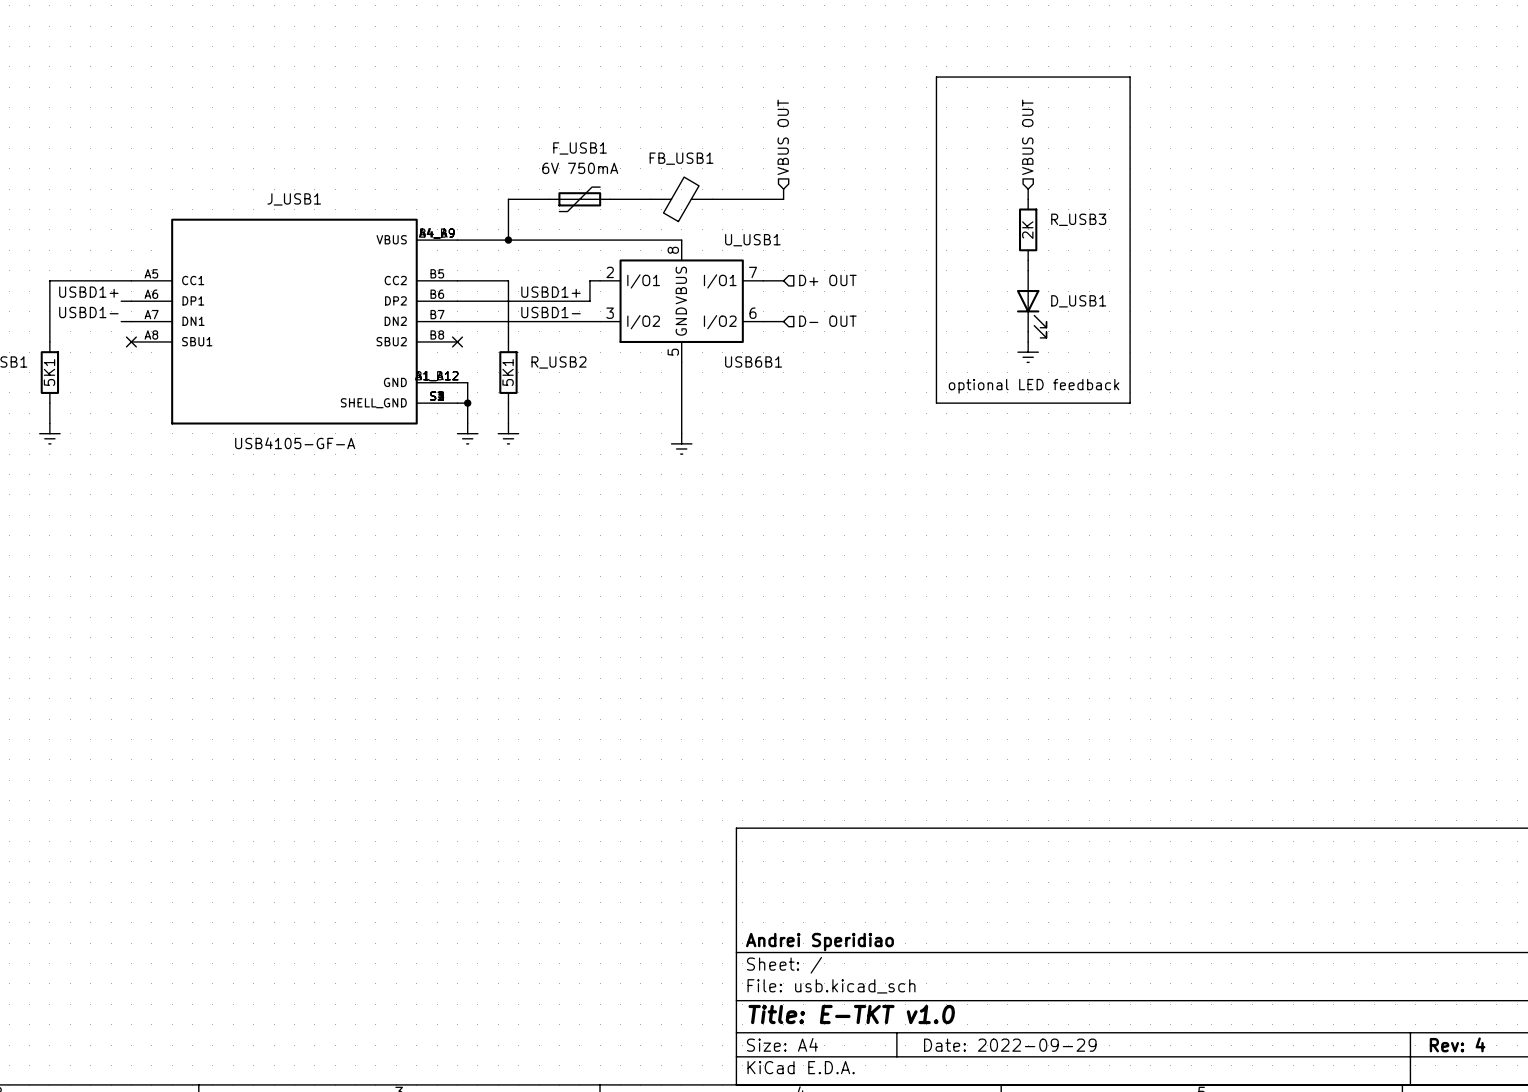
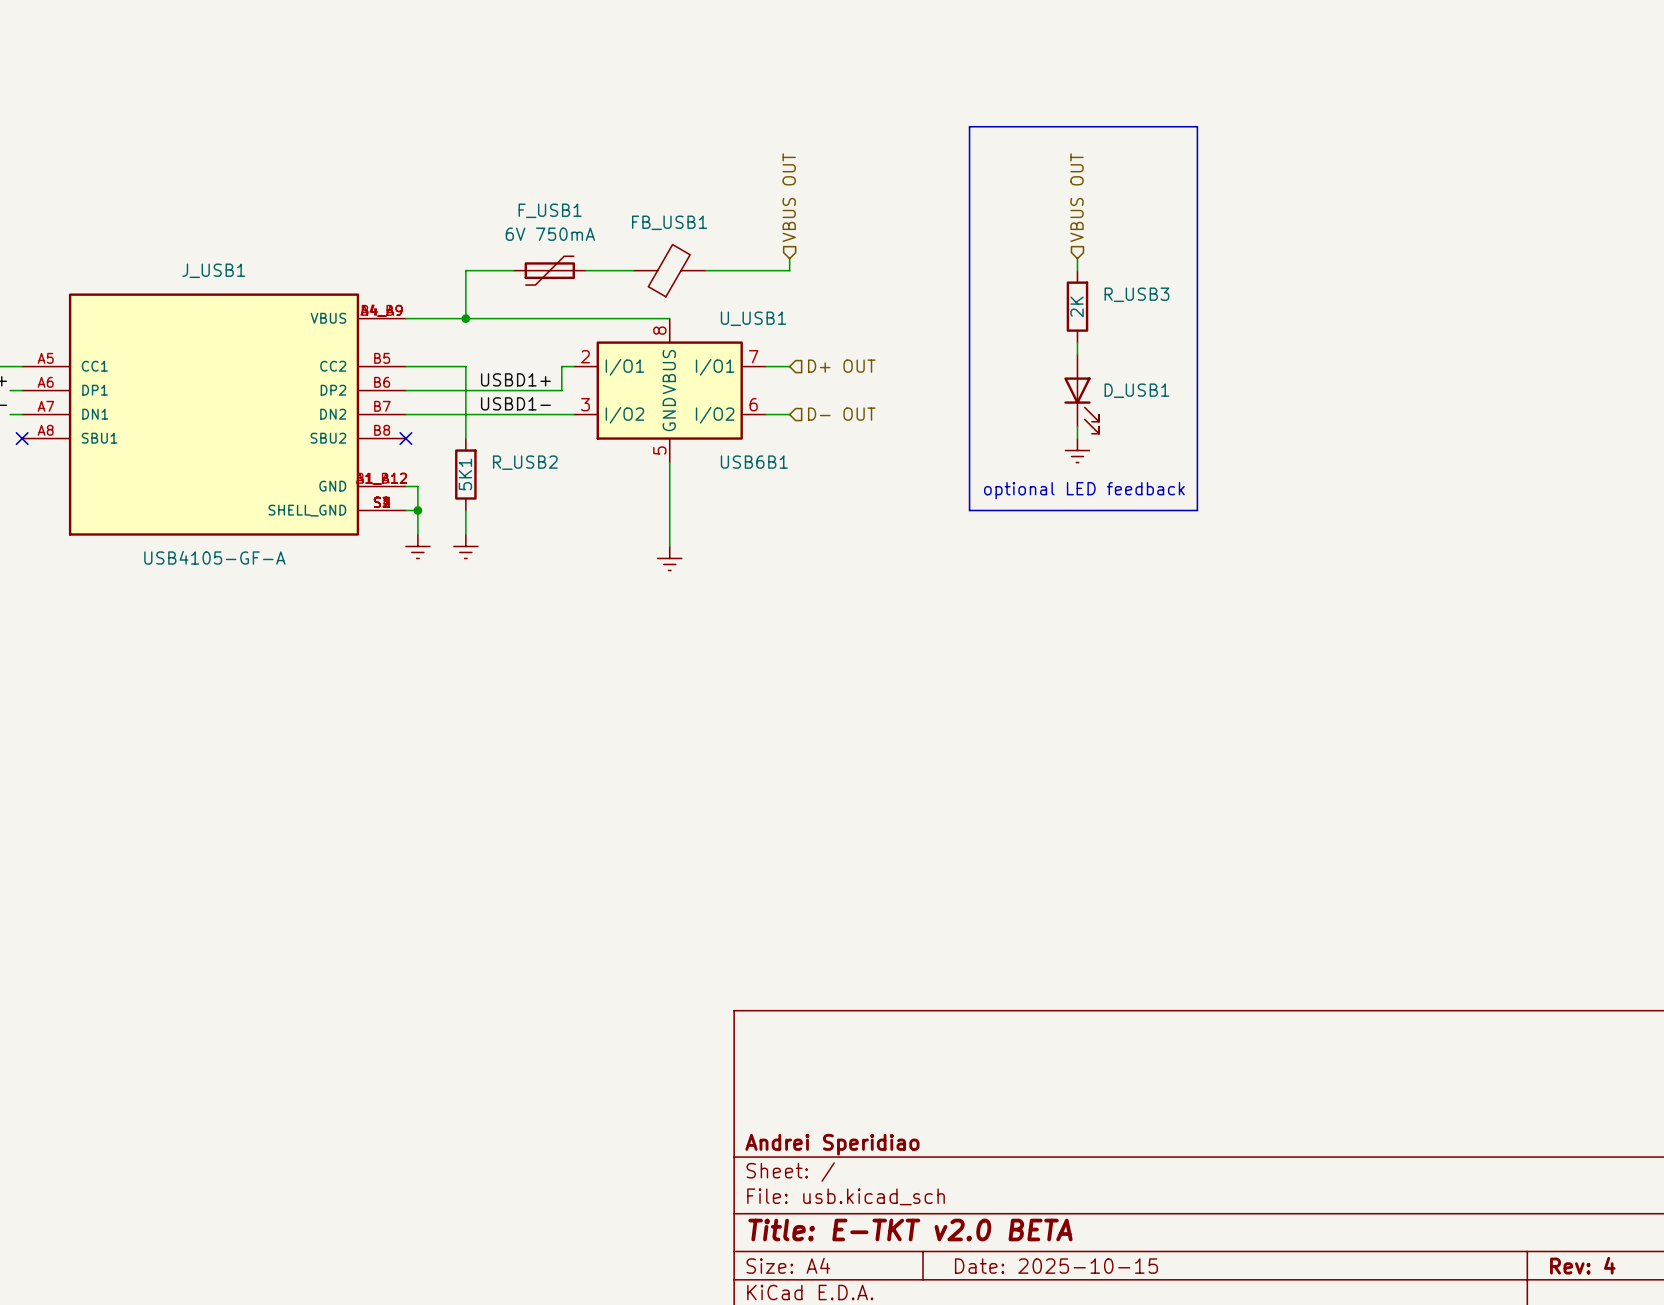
title block: Title: E-TKT v1.0 (851, 1014) -> Title: E-TKT v2.0 BETA (910, 1230)
title block: Date: 2022-09-29 (1010, 1045) -> Date: 2025-10-15 (1056, 1266)

